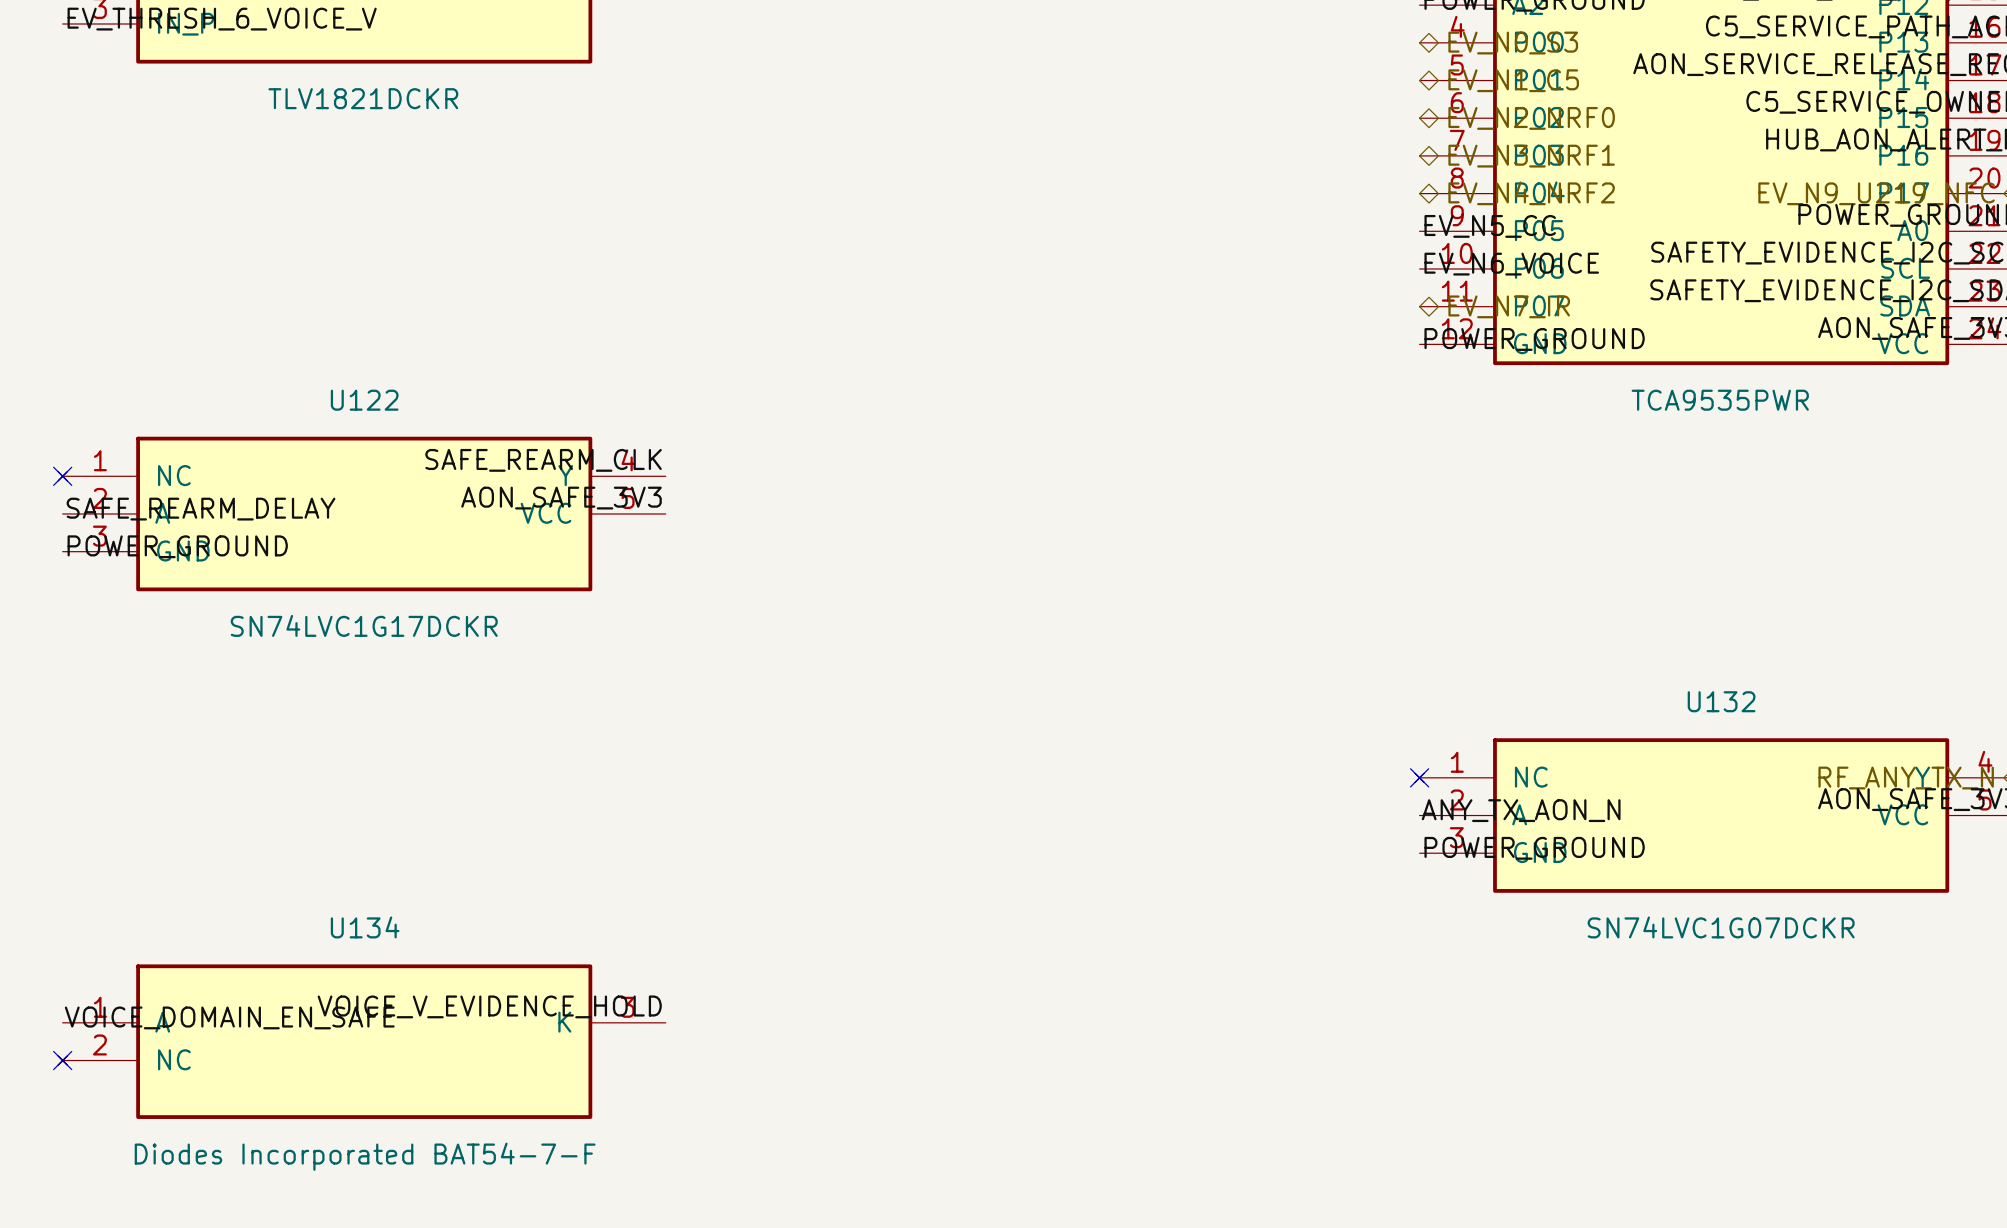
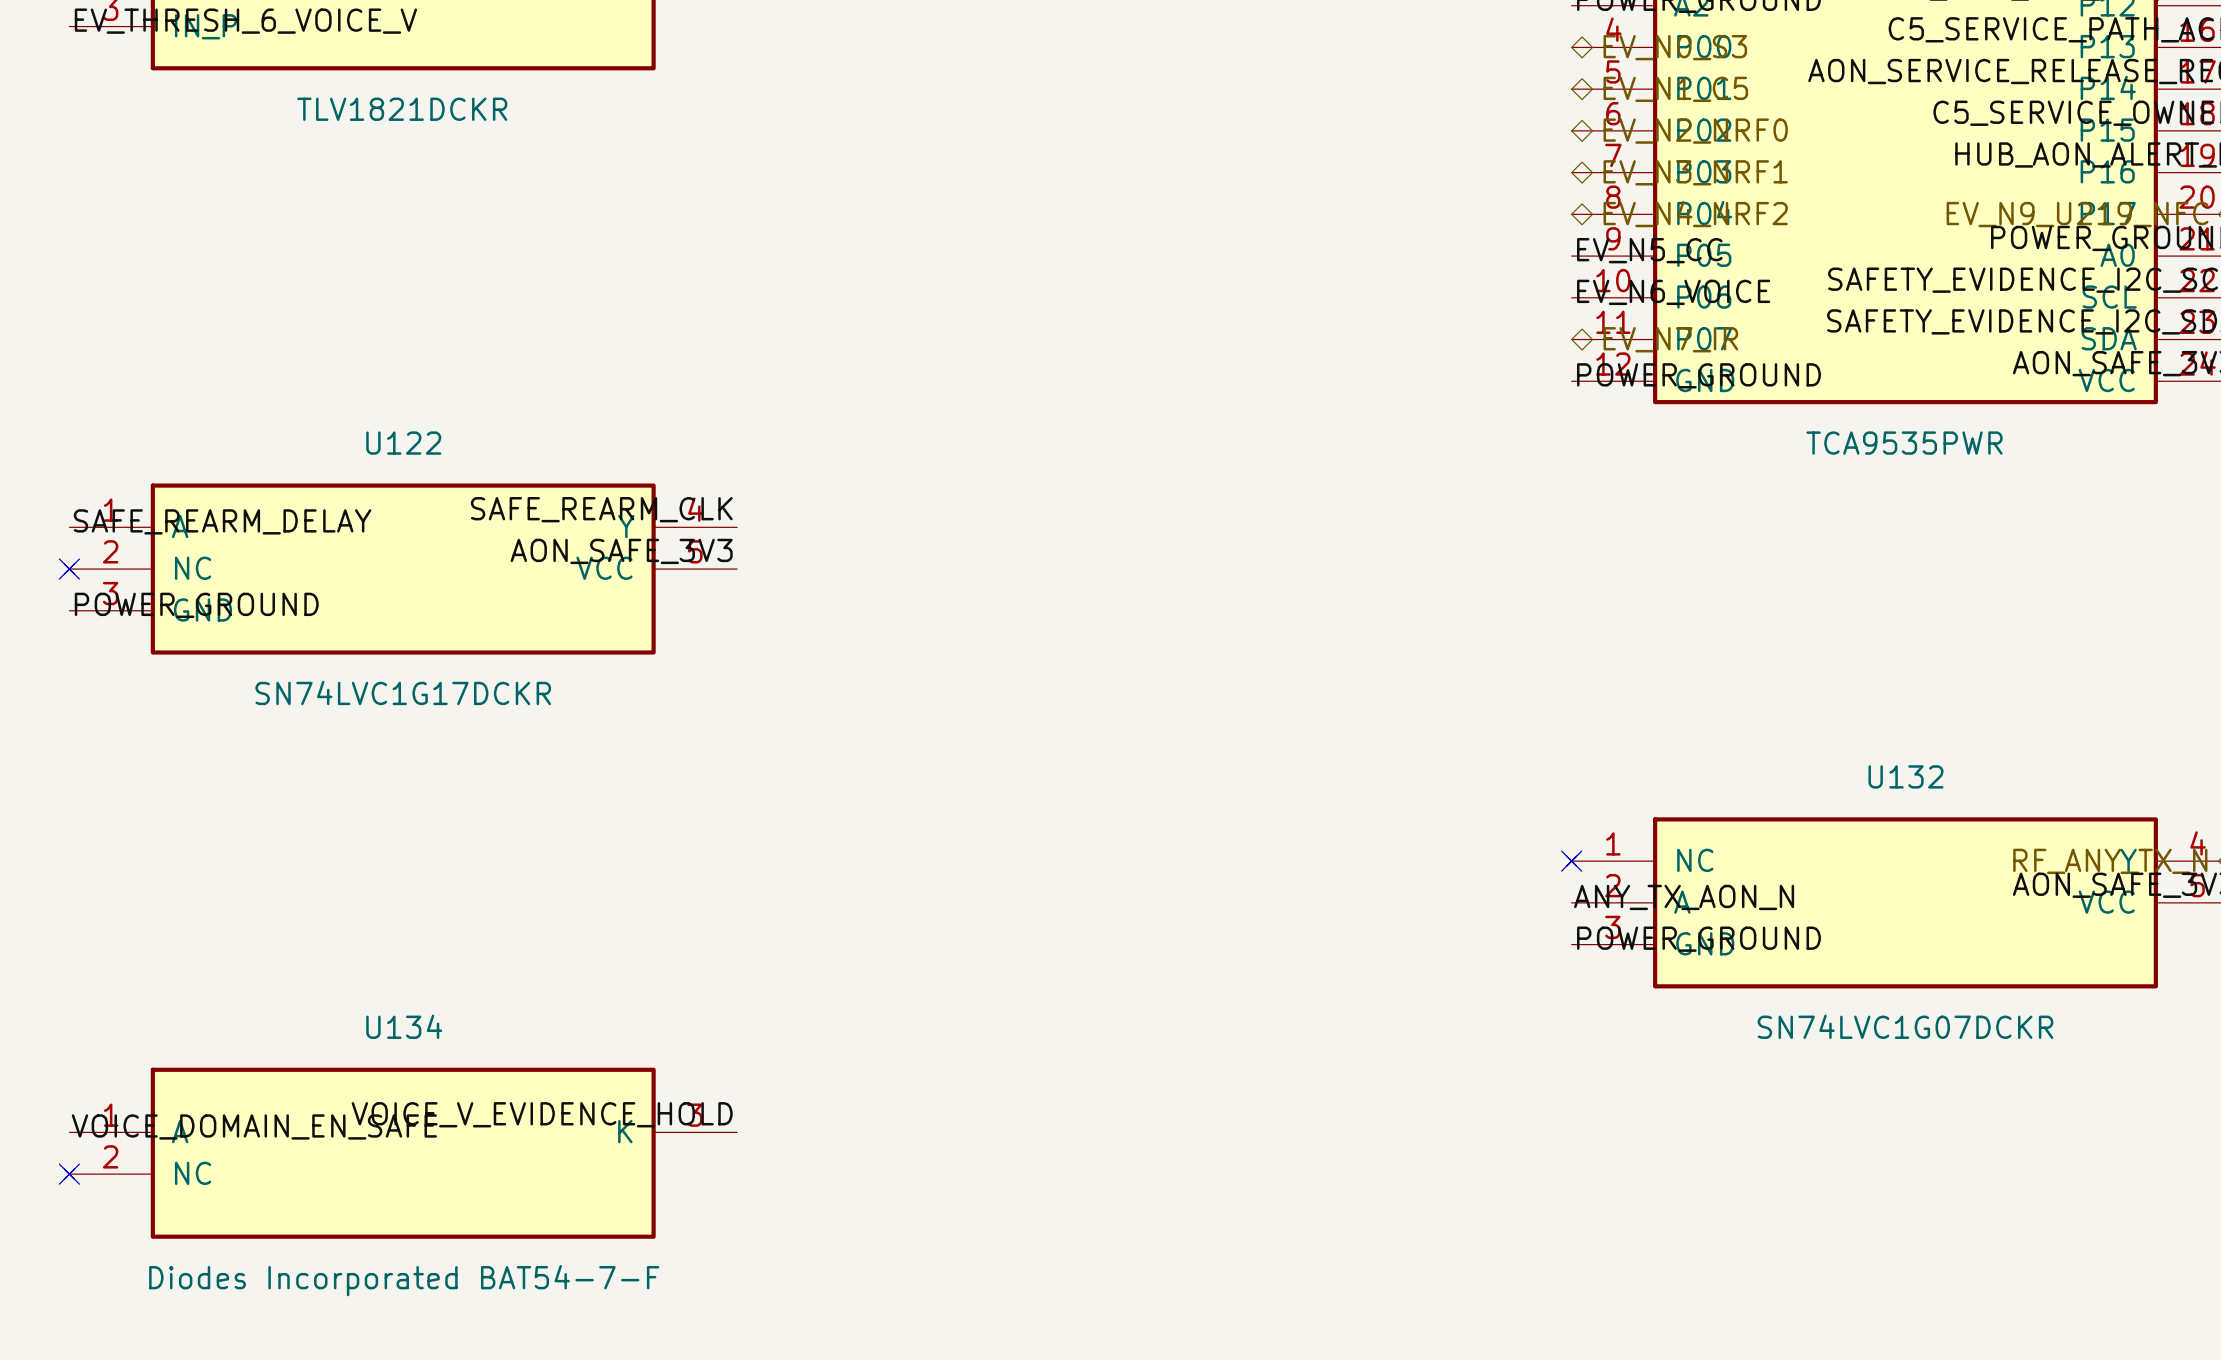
U122 symbol: [58, 436, 666, 592] -> [64, 483, 738, 655]
no-connect mark position: (62, 476) -> (69, 569)
label position: SAFE_REARM_DELAY (201, 509) -> SAFE_REARM_DELAY (222, 521)

